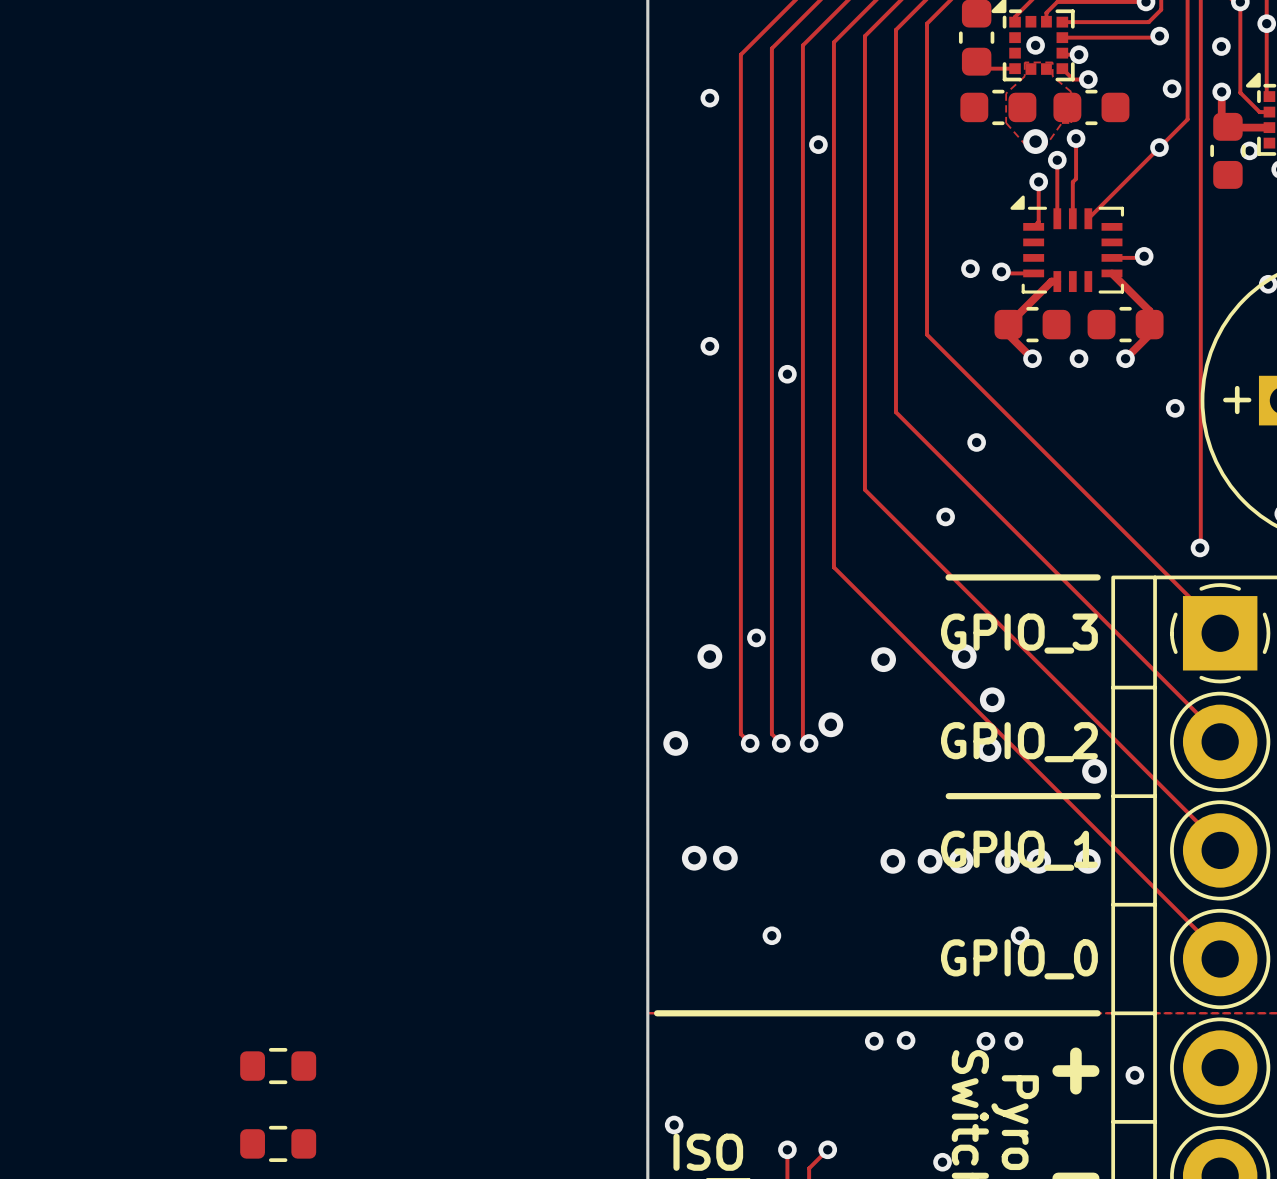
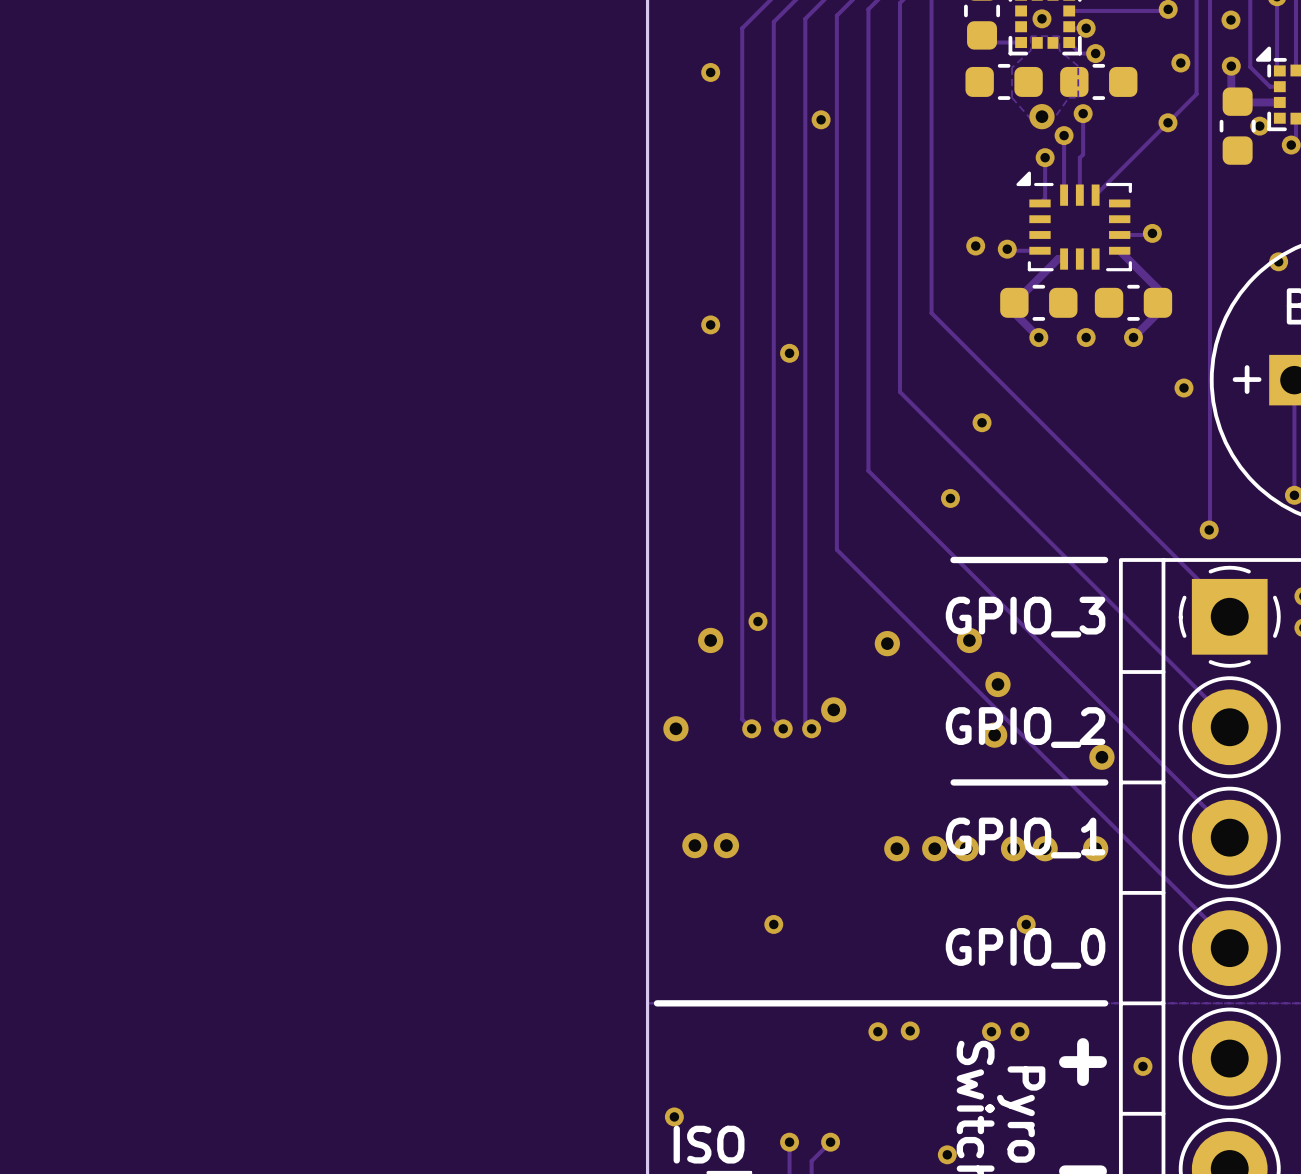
part: (278, 1066) -> none
part: (278, 1143) -> none

